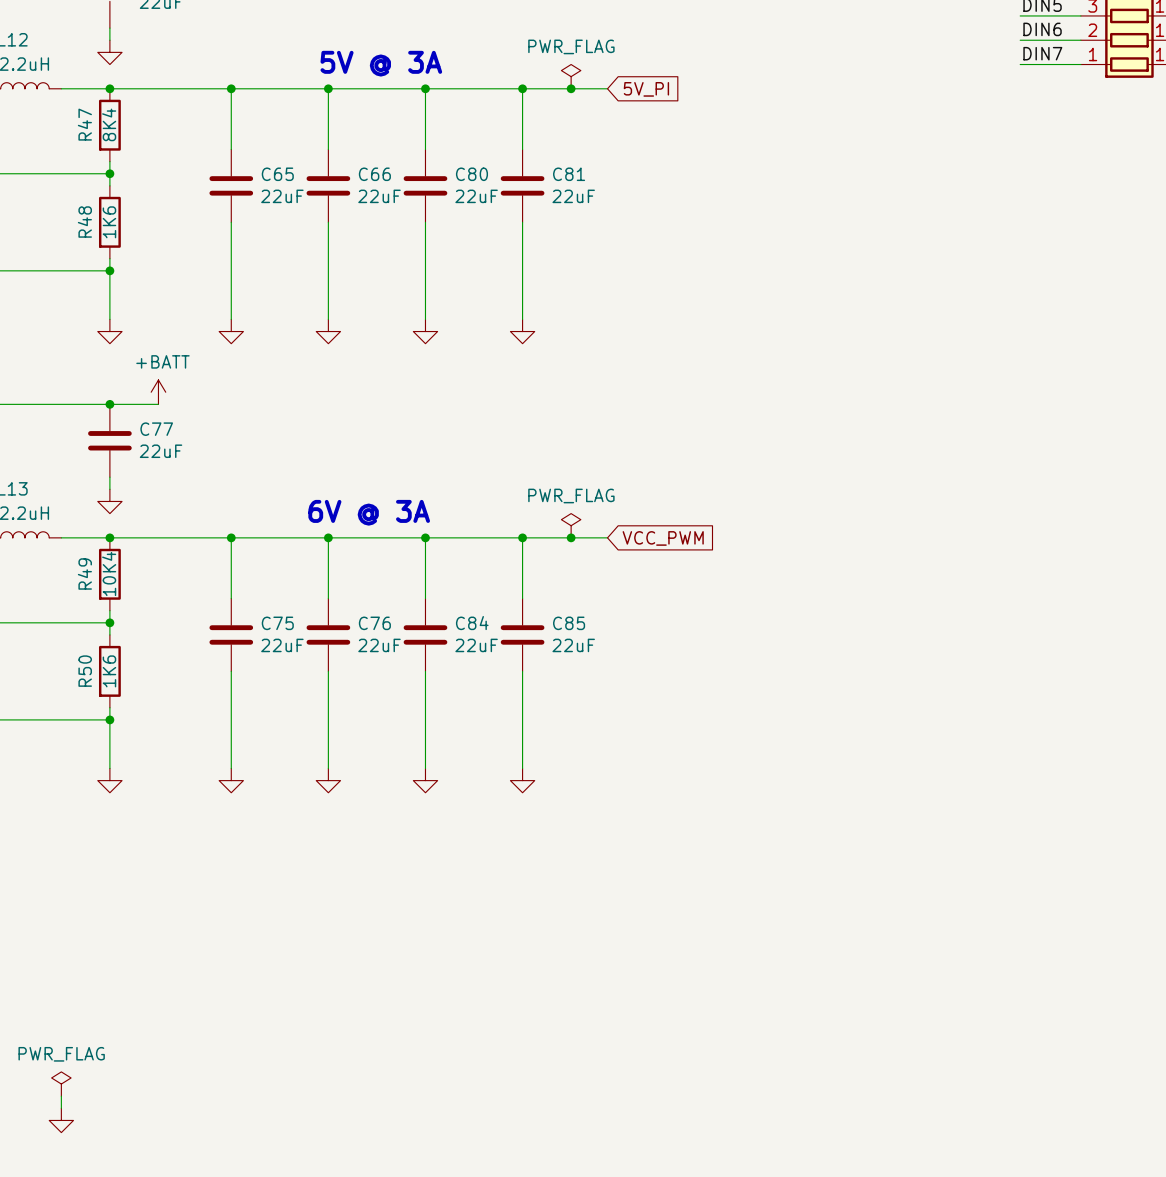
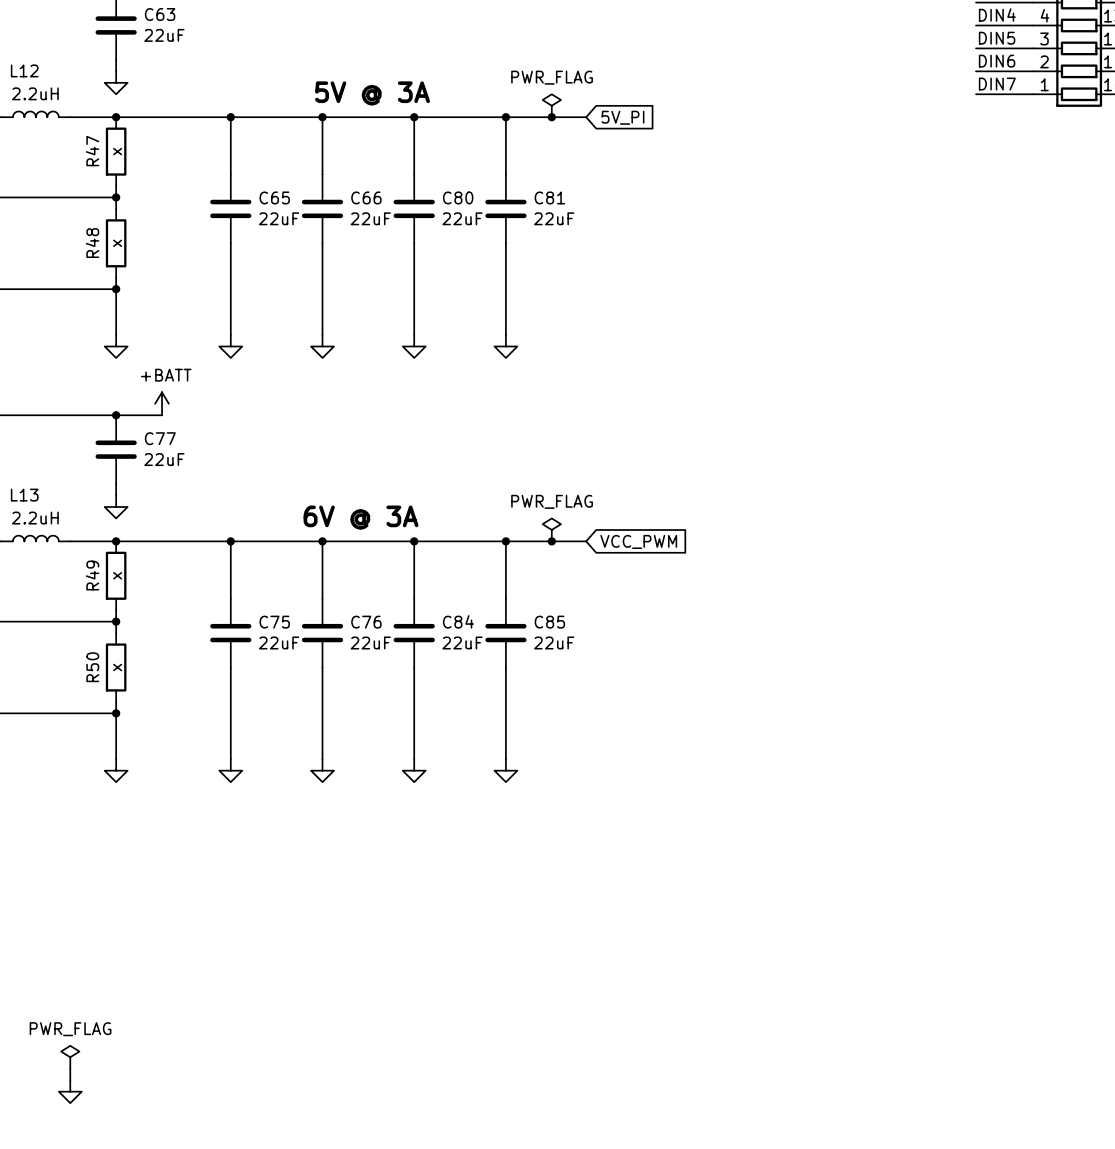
R47 value: 8K4 (109, 124) -> x (117, 151)
R48 value: 1K6 (109, 222) -> x (117, 243)
R49 value: 10K4 (109, 573) -> x (117, 575)
R50 value: 1K6 (109, 671) -> x (117, 667)

